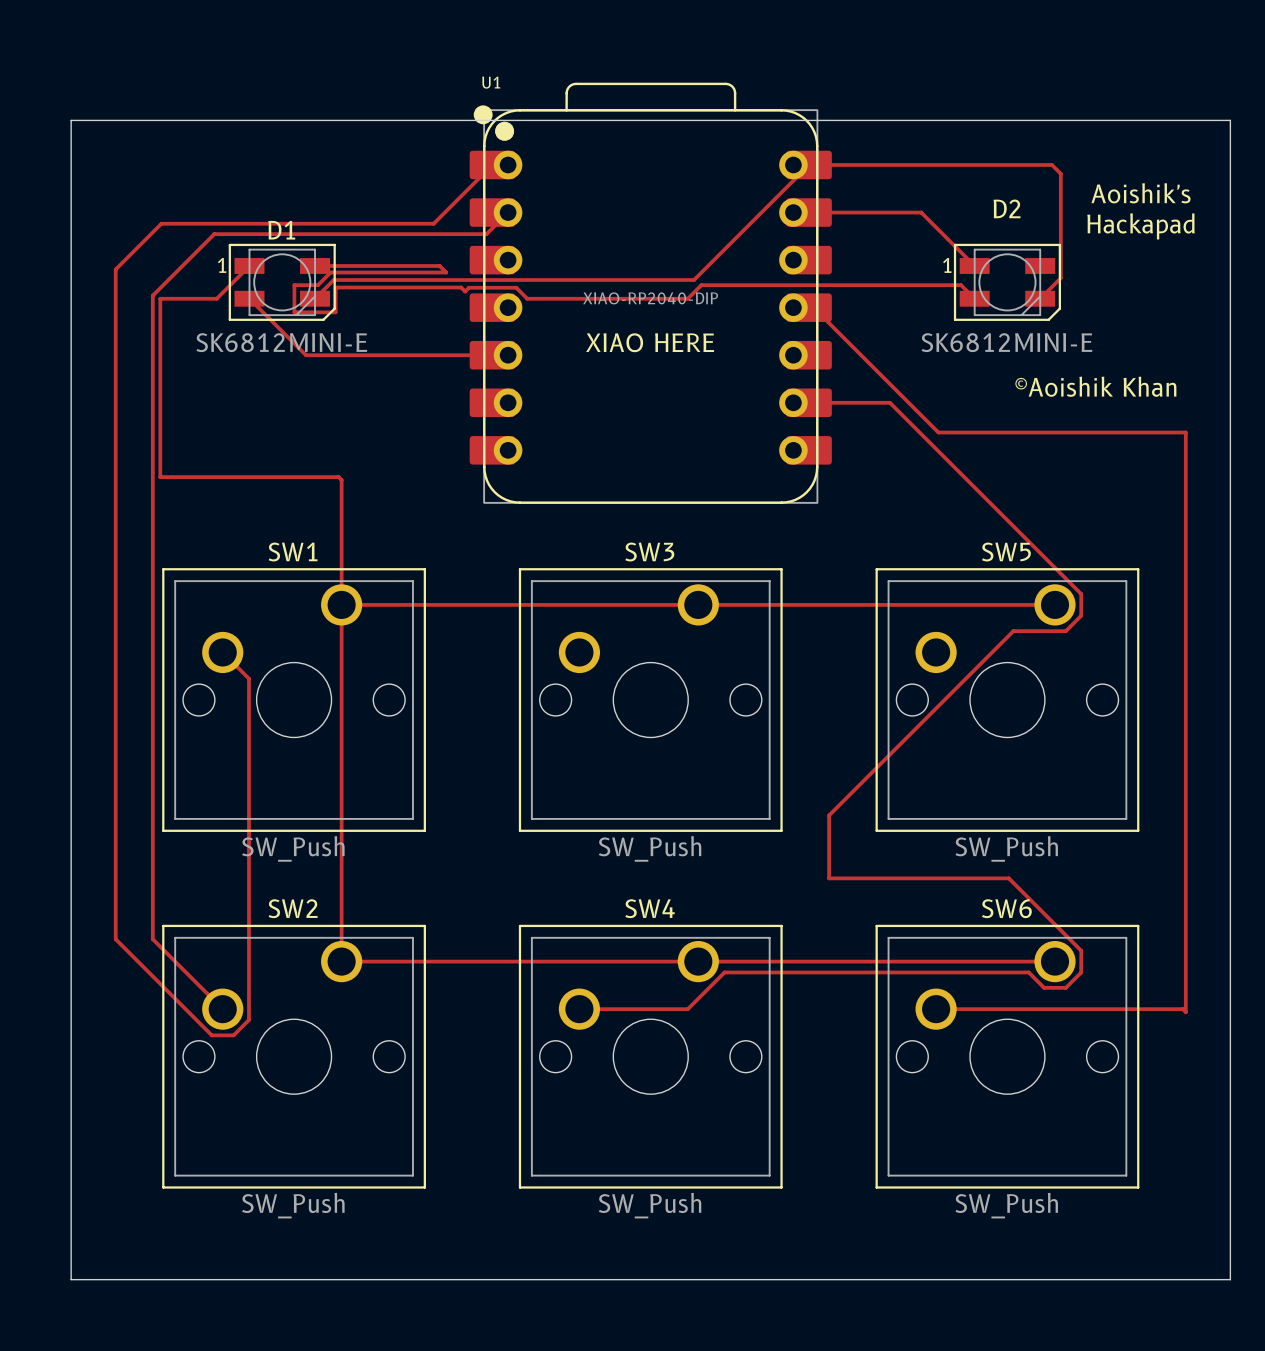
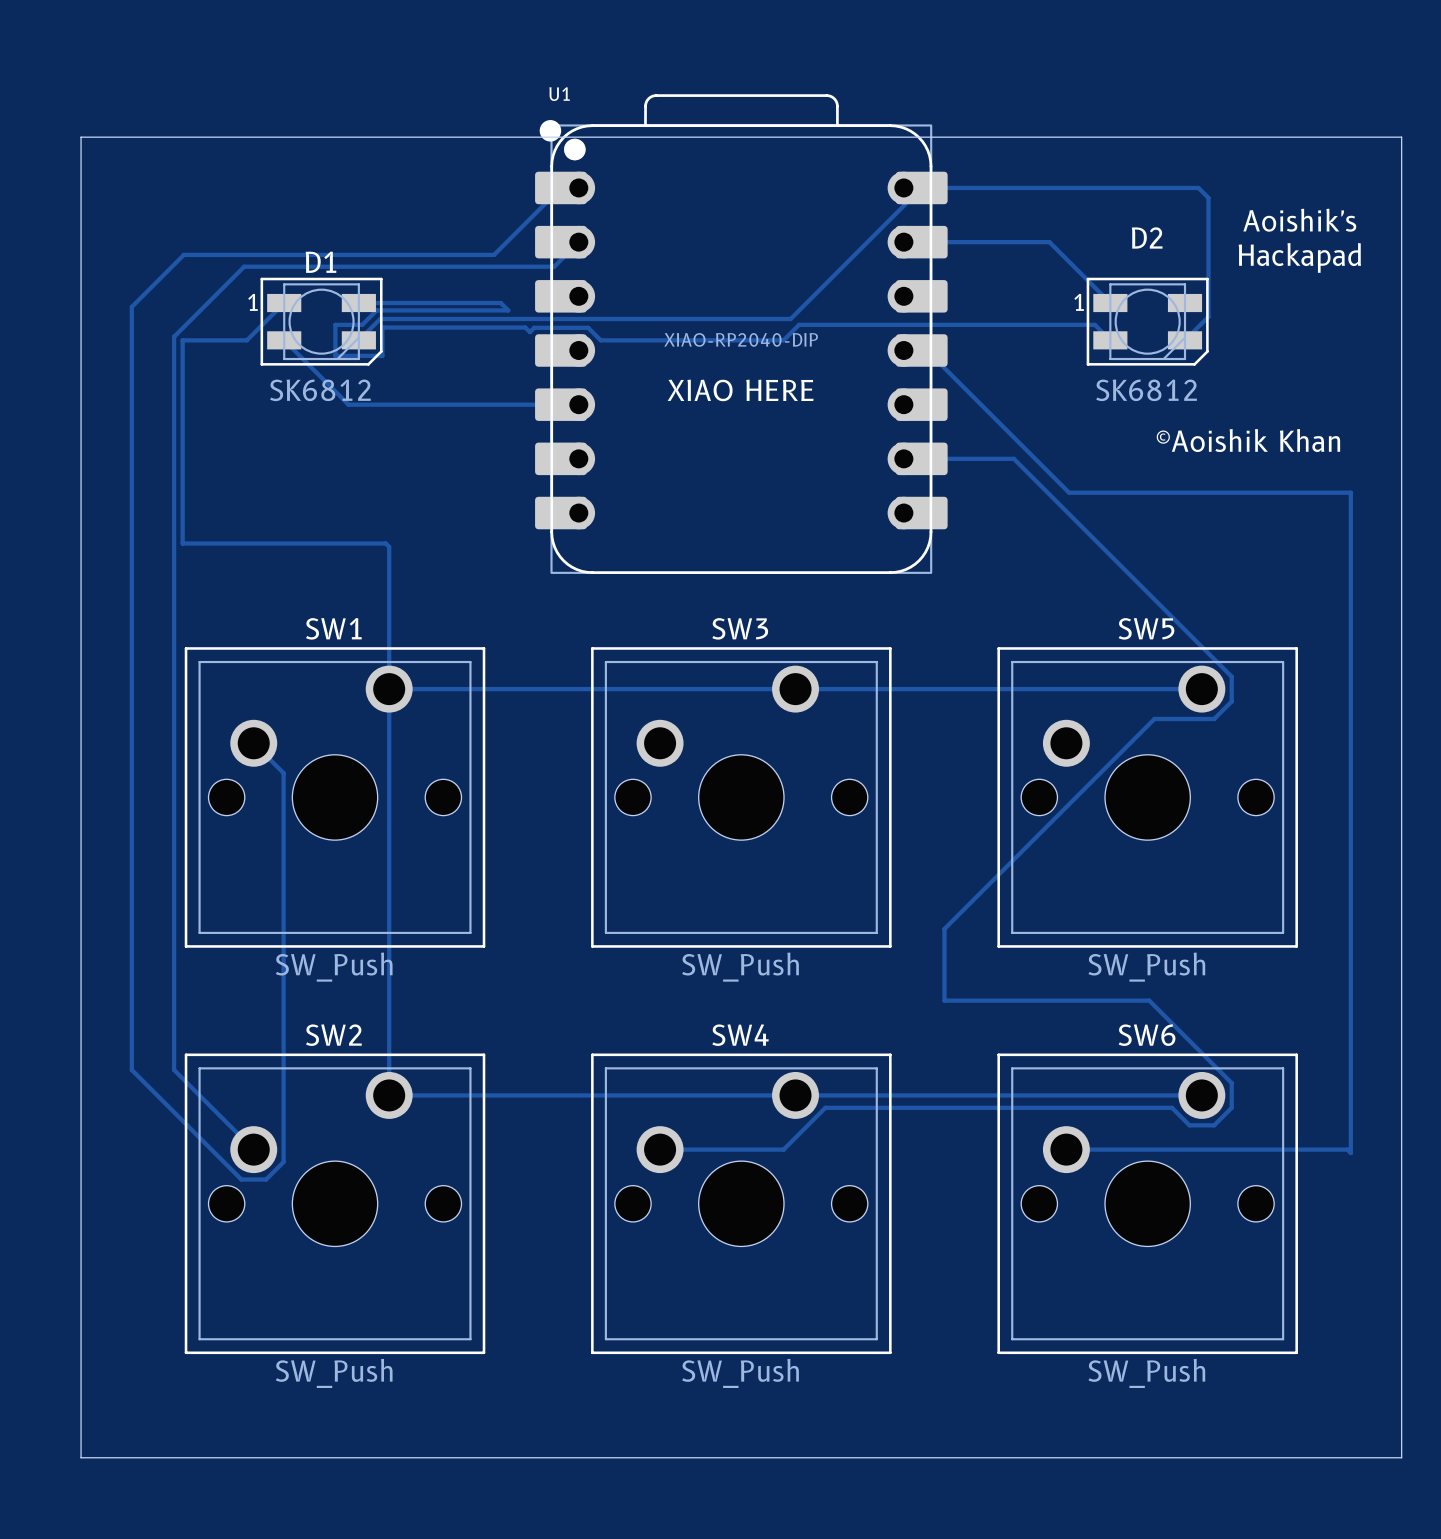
D1 value: SK6812MINI-E (281, 342) -> SK6812 (320, 390)
D2 value: SK6812MINI-E (1007, 342) -> SK6812 (1146, 390)

